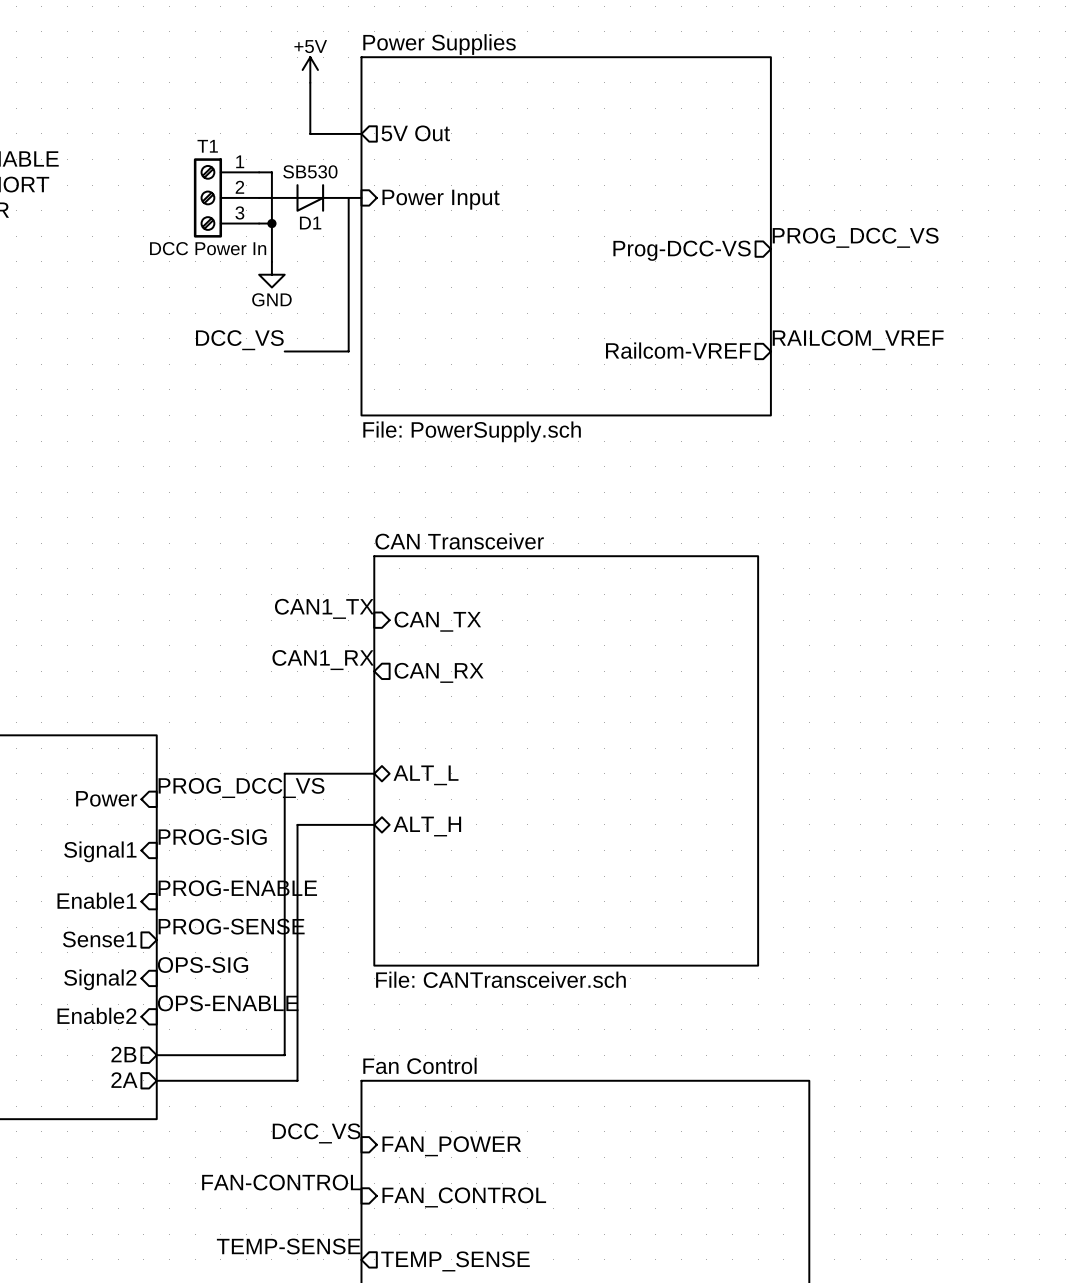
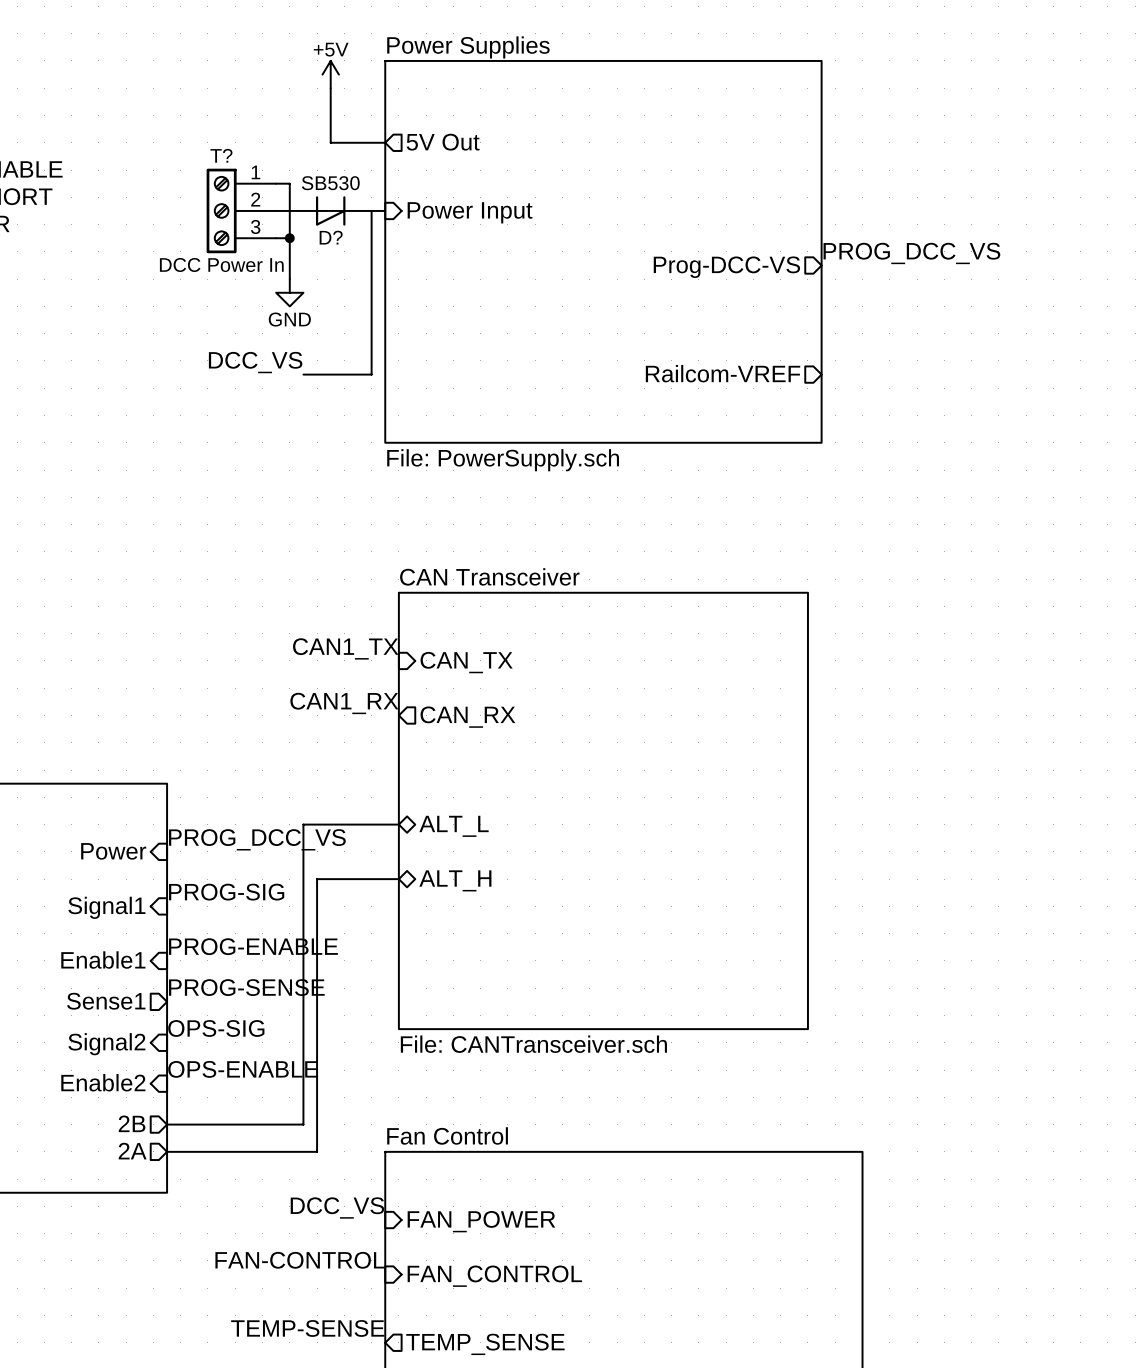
T1 name: T1 (207, 146) -> T? (221, 155)
D1 name: D1 (310, 223) -> D? (331, 237)
label: RAILCOM_VREF (858, 340) -> none

